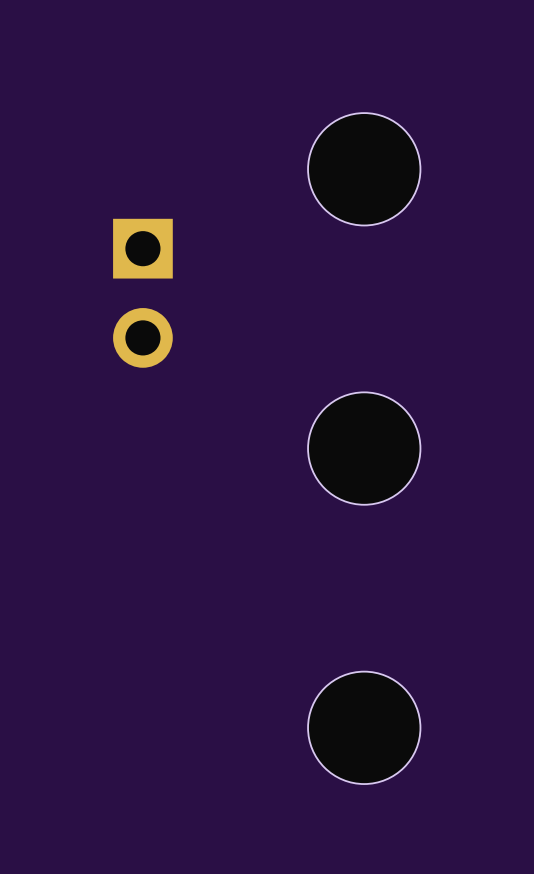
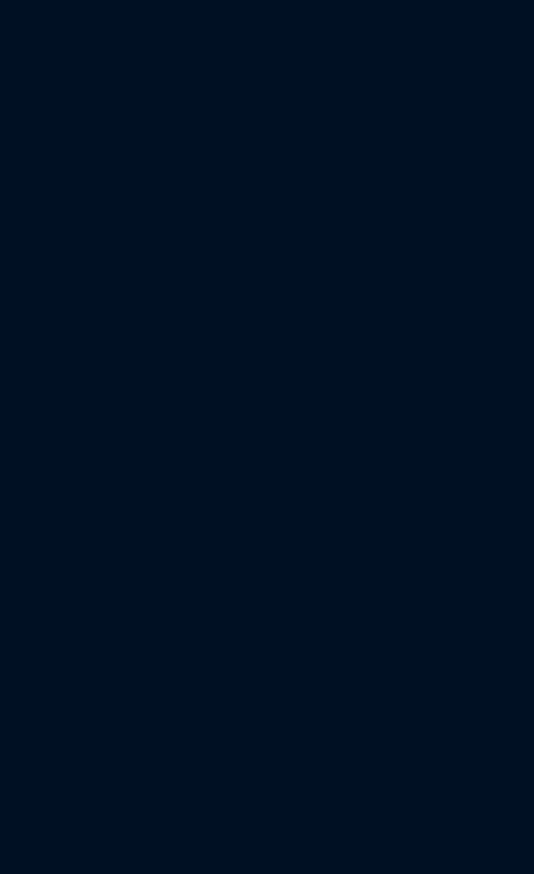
part: (364, 169) -> none
part: (142, 293) -> none
part: (364, 448) -> none
part: (364, 727) -> none

